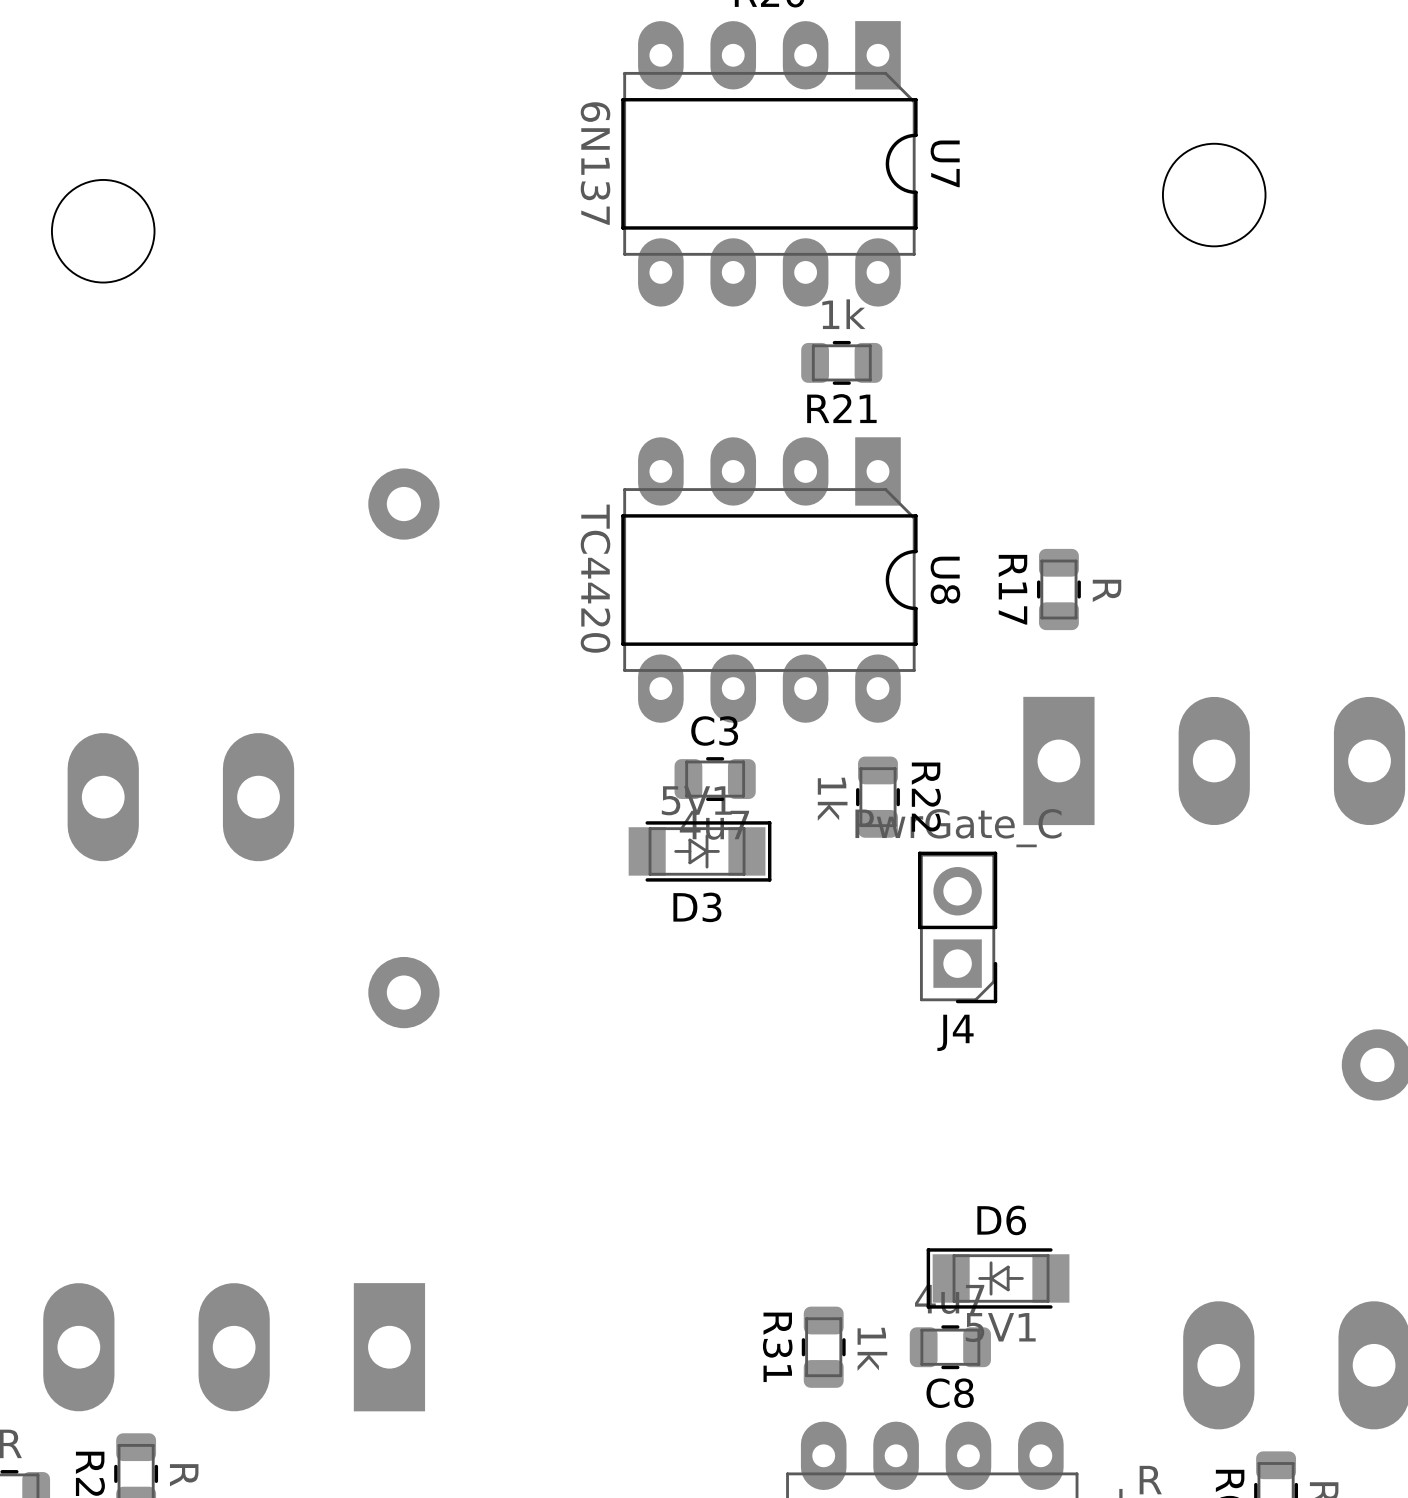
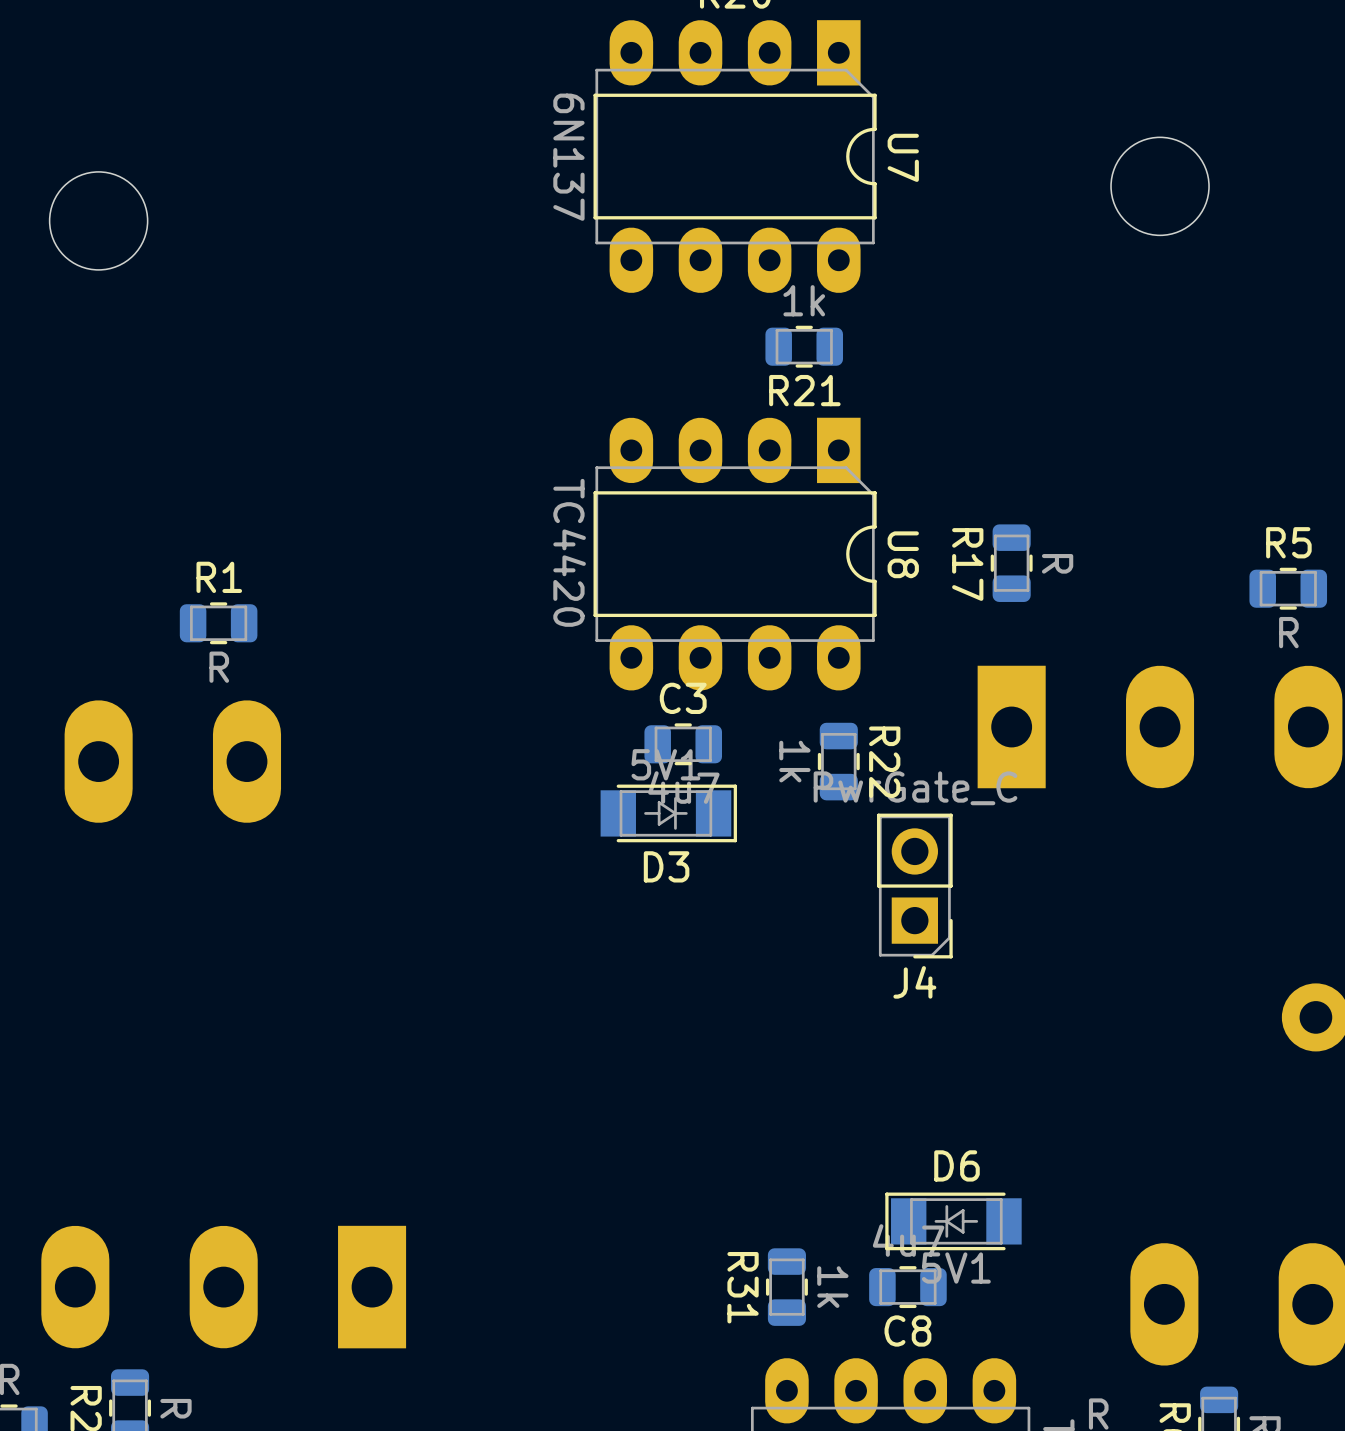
part: (403, 504) -> none
R5: none -> R (1288, 588)
R1: none -> R (218, 623)
part: (403, 992) -> none

